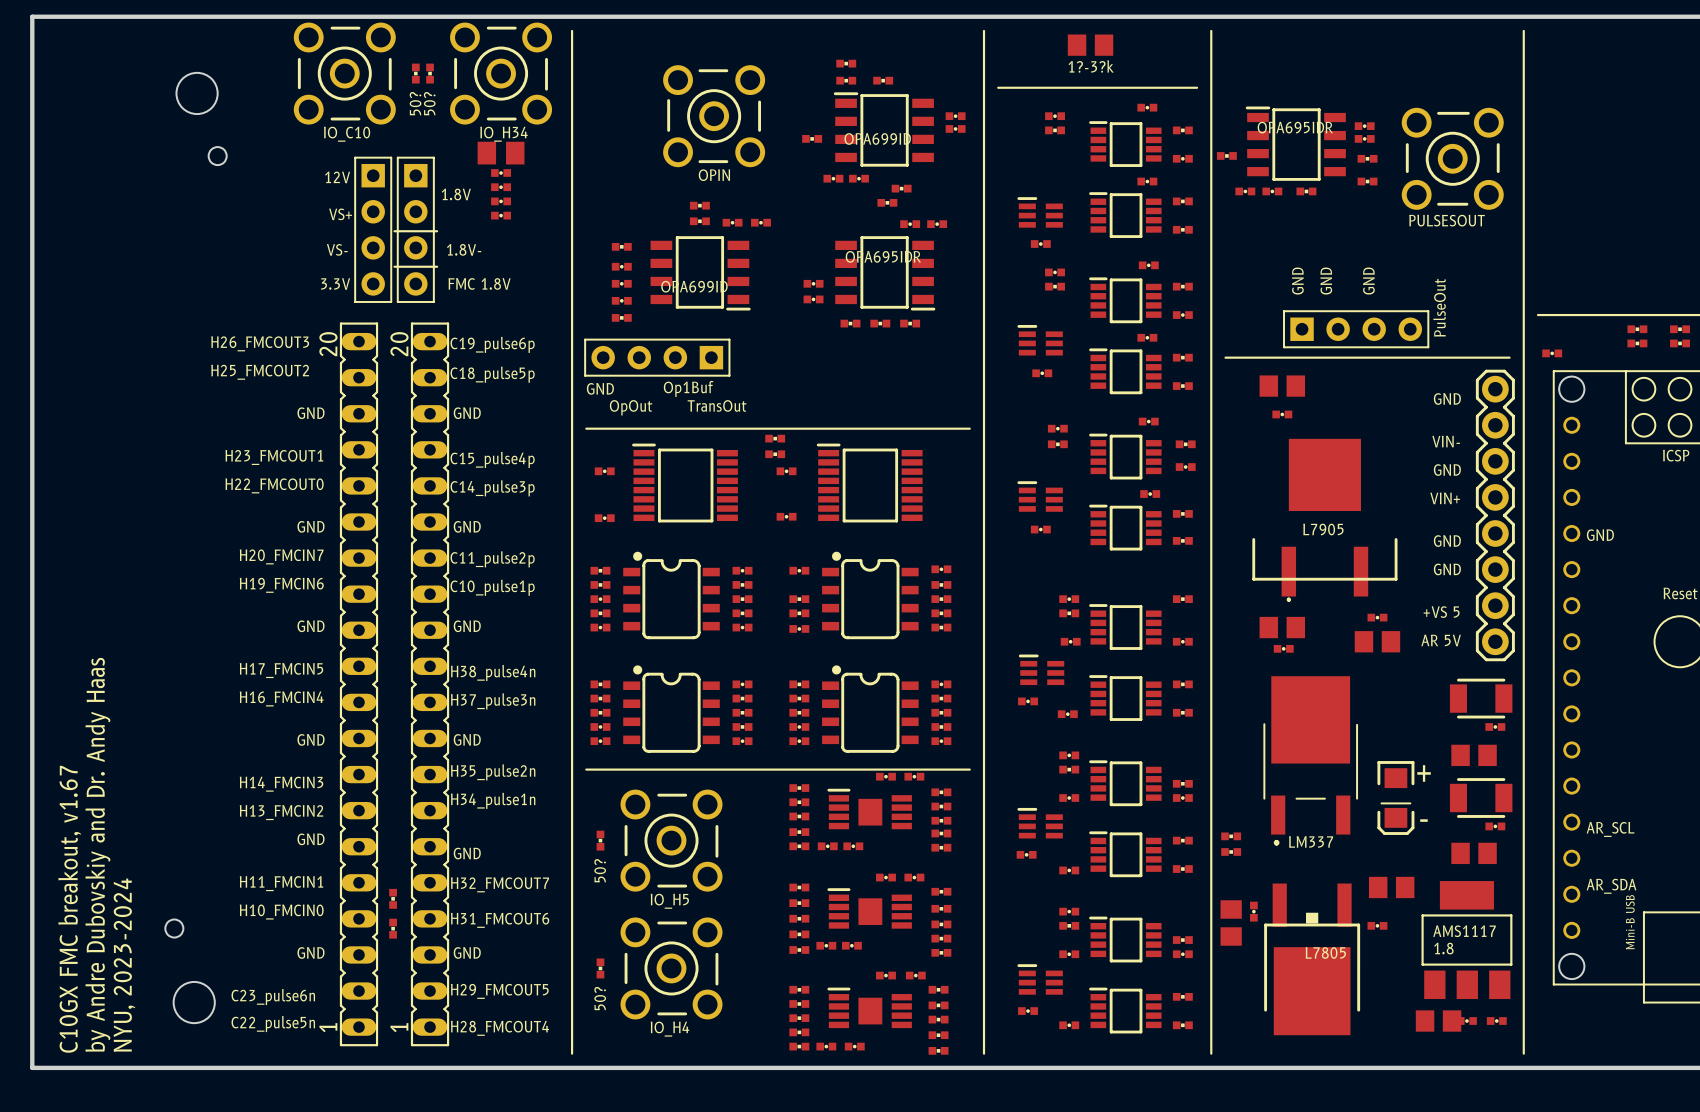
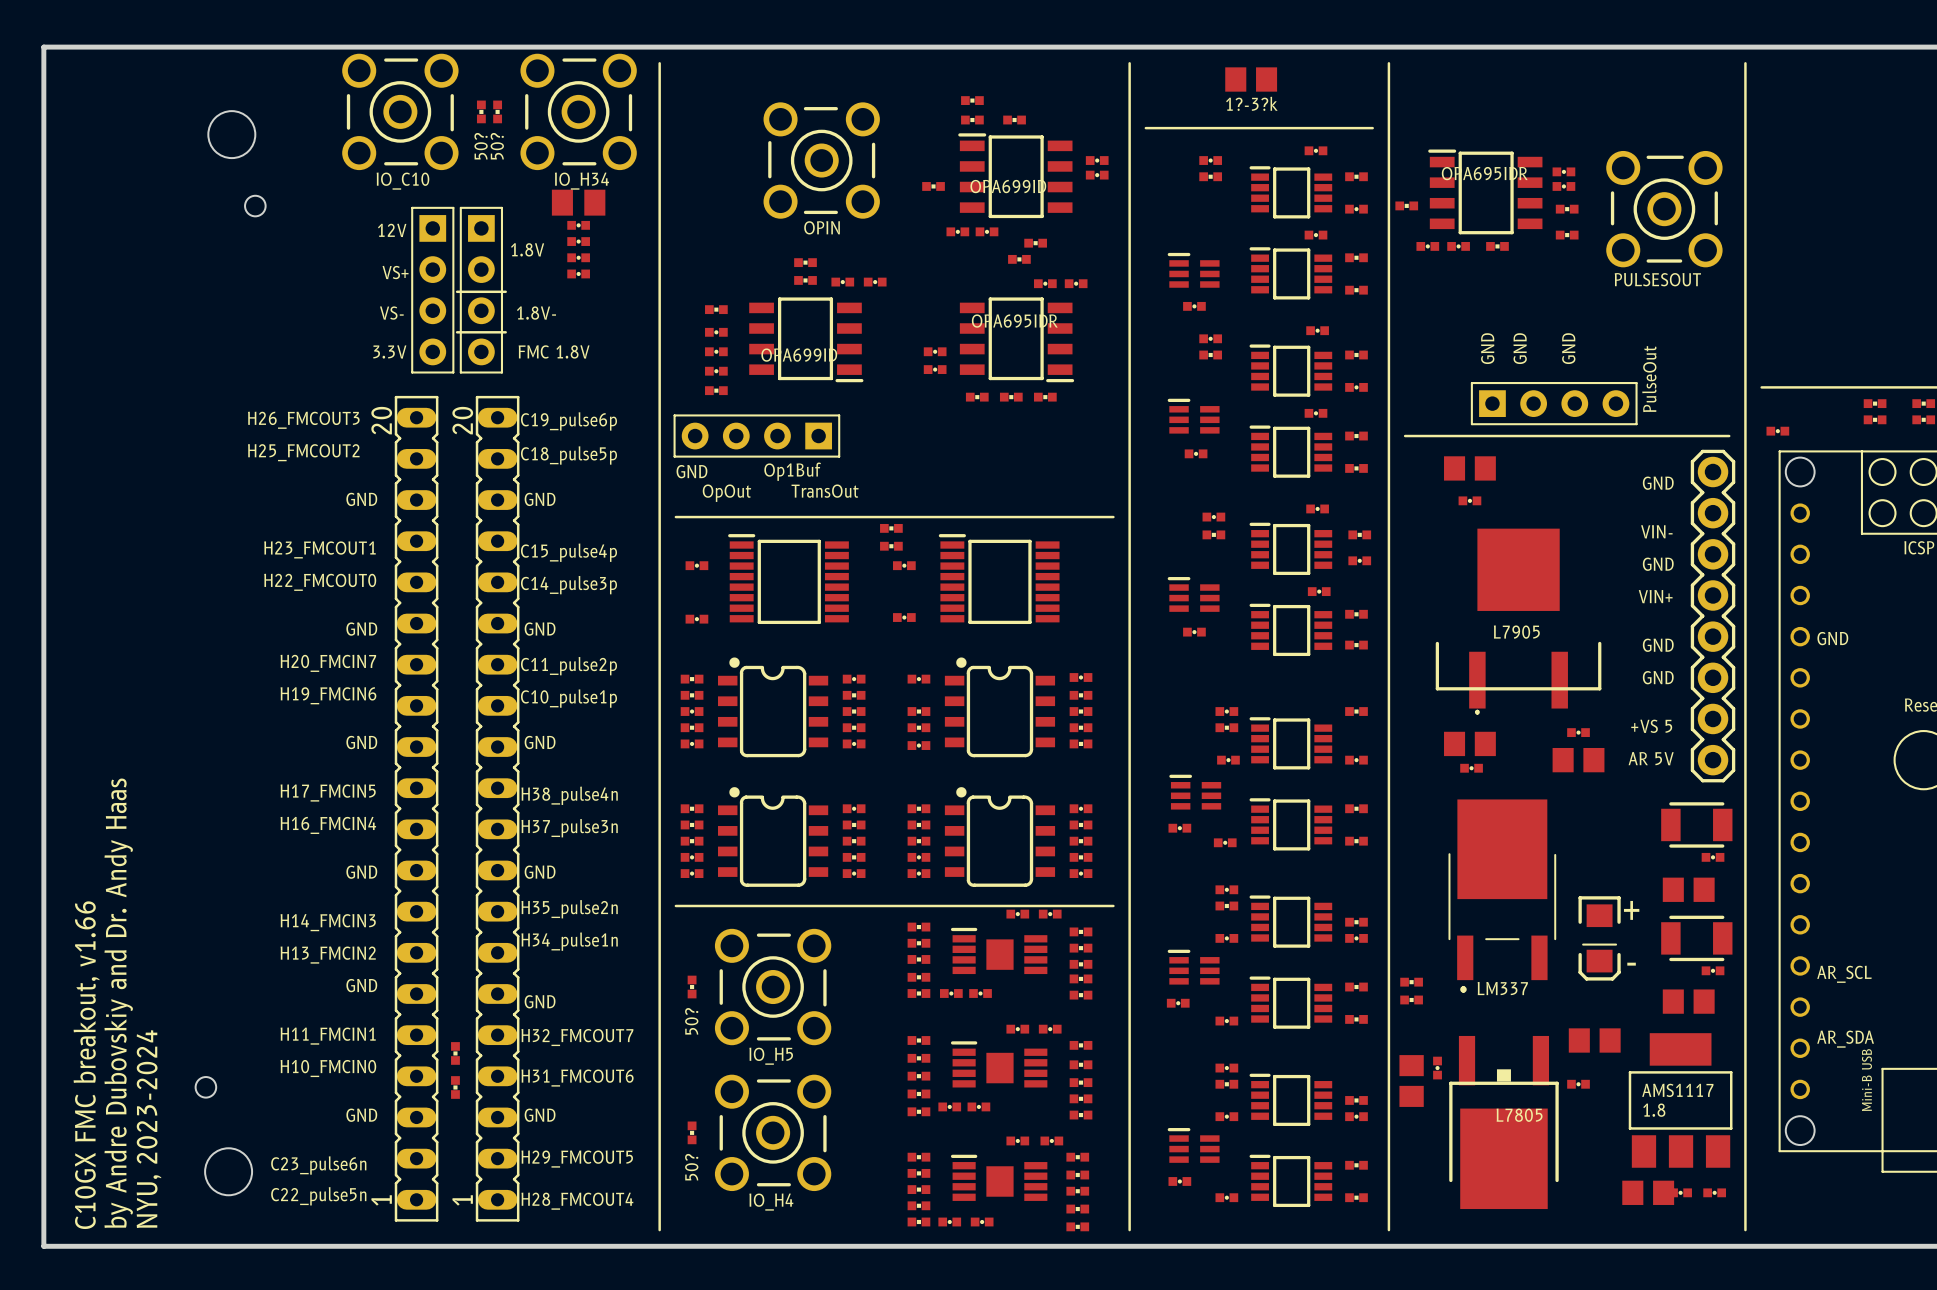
text: C10GX FMC breakout, v1.67 (69, 909) -> C10GX FMC breakout, v1.66 (86, 1065)

